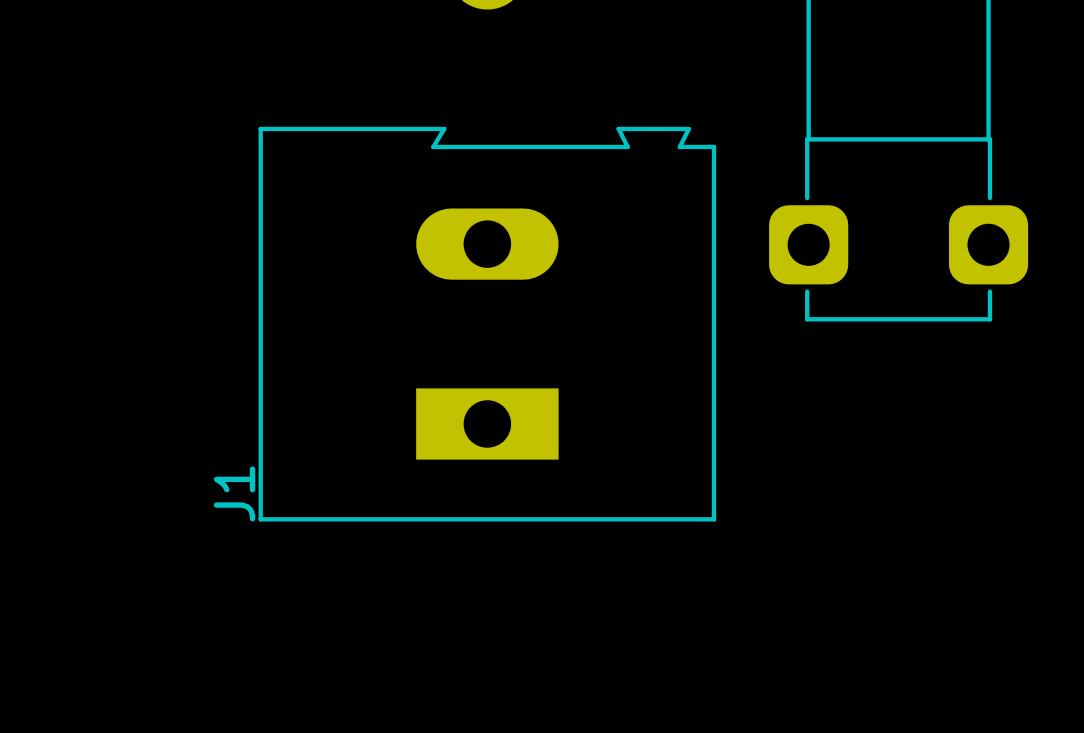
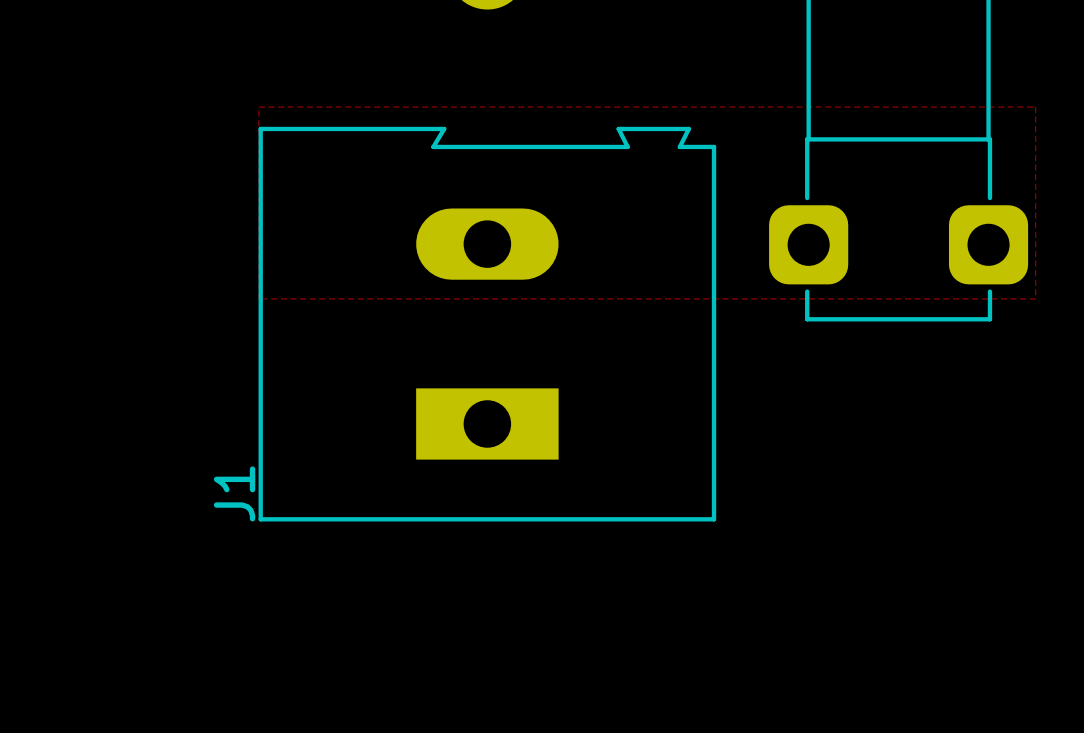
top zone outline: none -> (258, 107) (1035, 107) (1035, 298) (258, 298) (258, 107)

